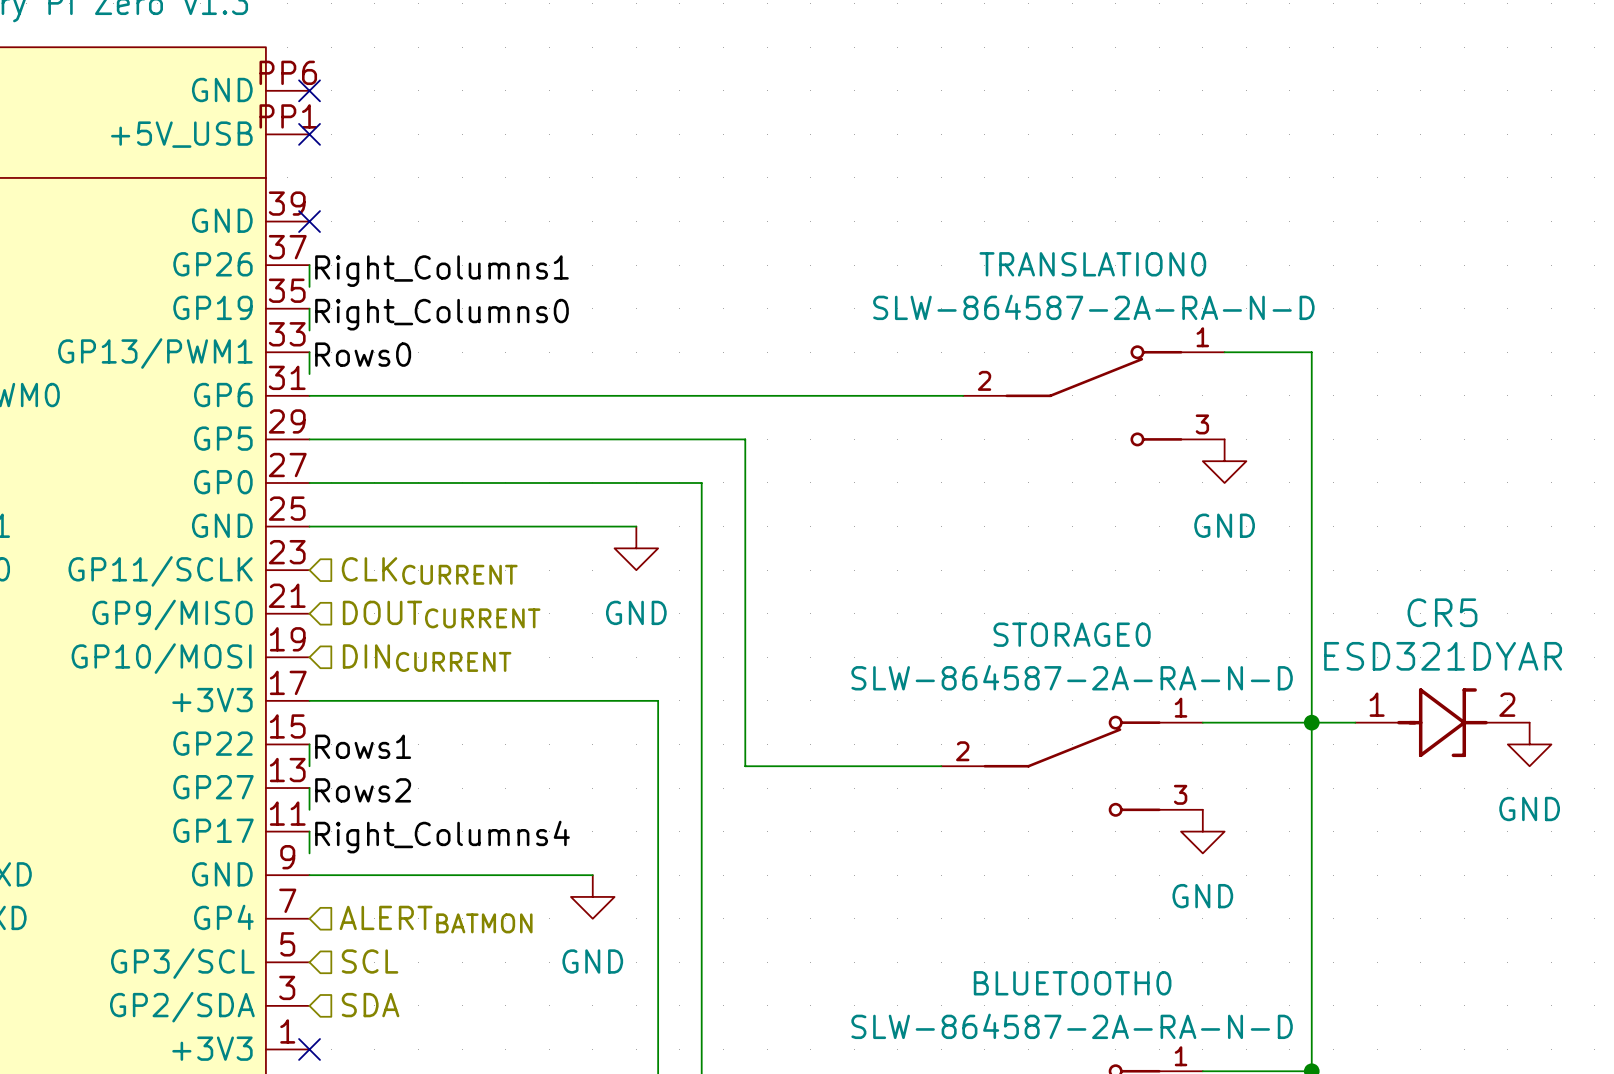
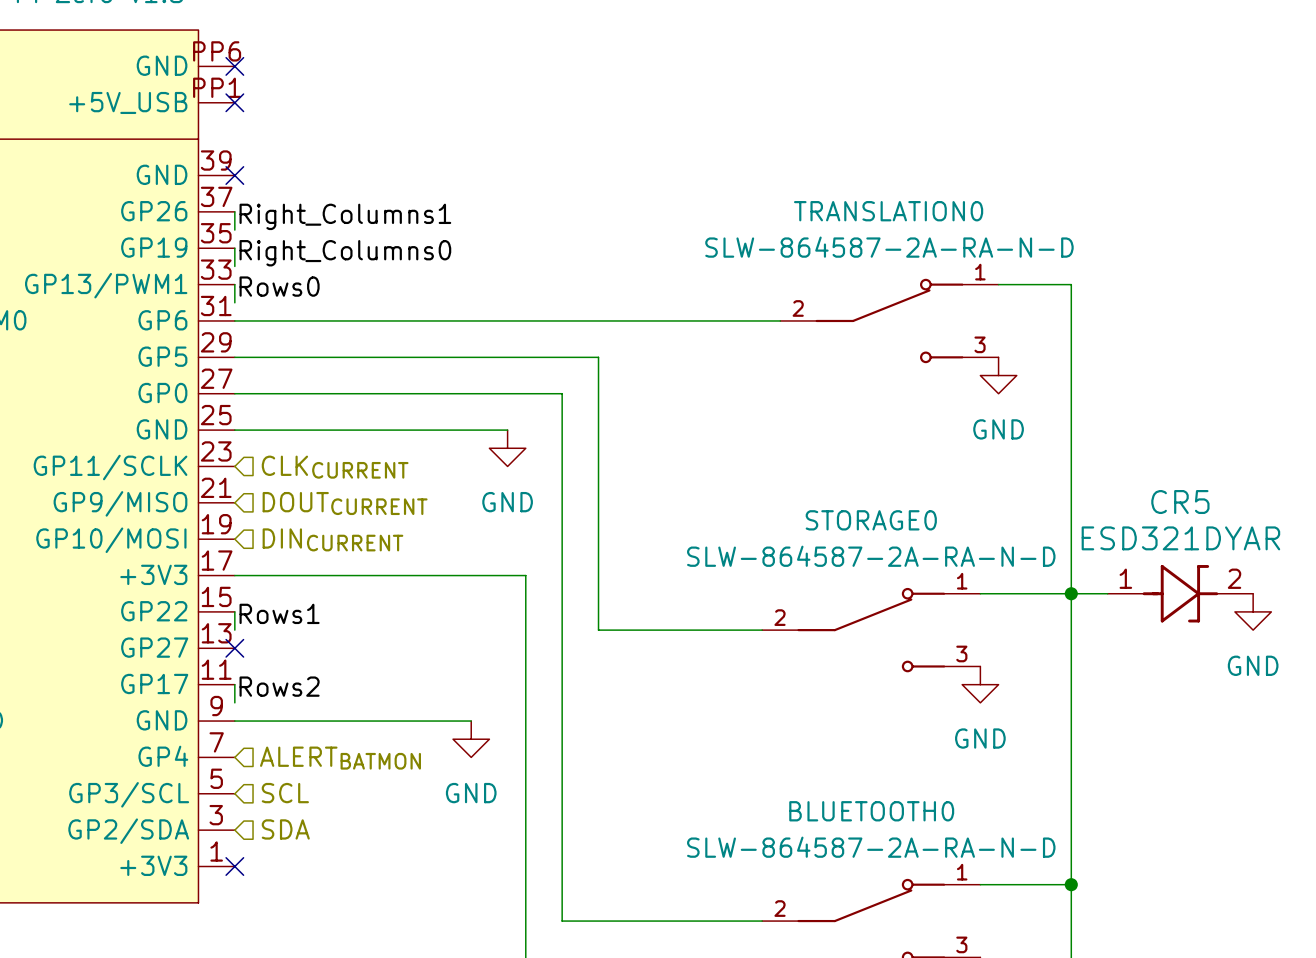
wire: (309, 788) (309, 809) -> none
no-connect mark: none -> (234, 648)
label: Rows2 (363, 790) -> none
label: Right_Columns4 (442, 837) -> Rows2 (279, 686)

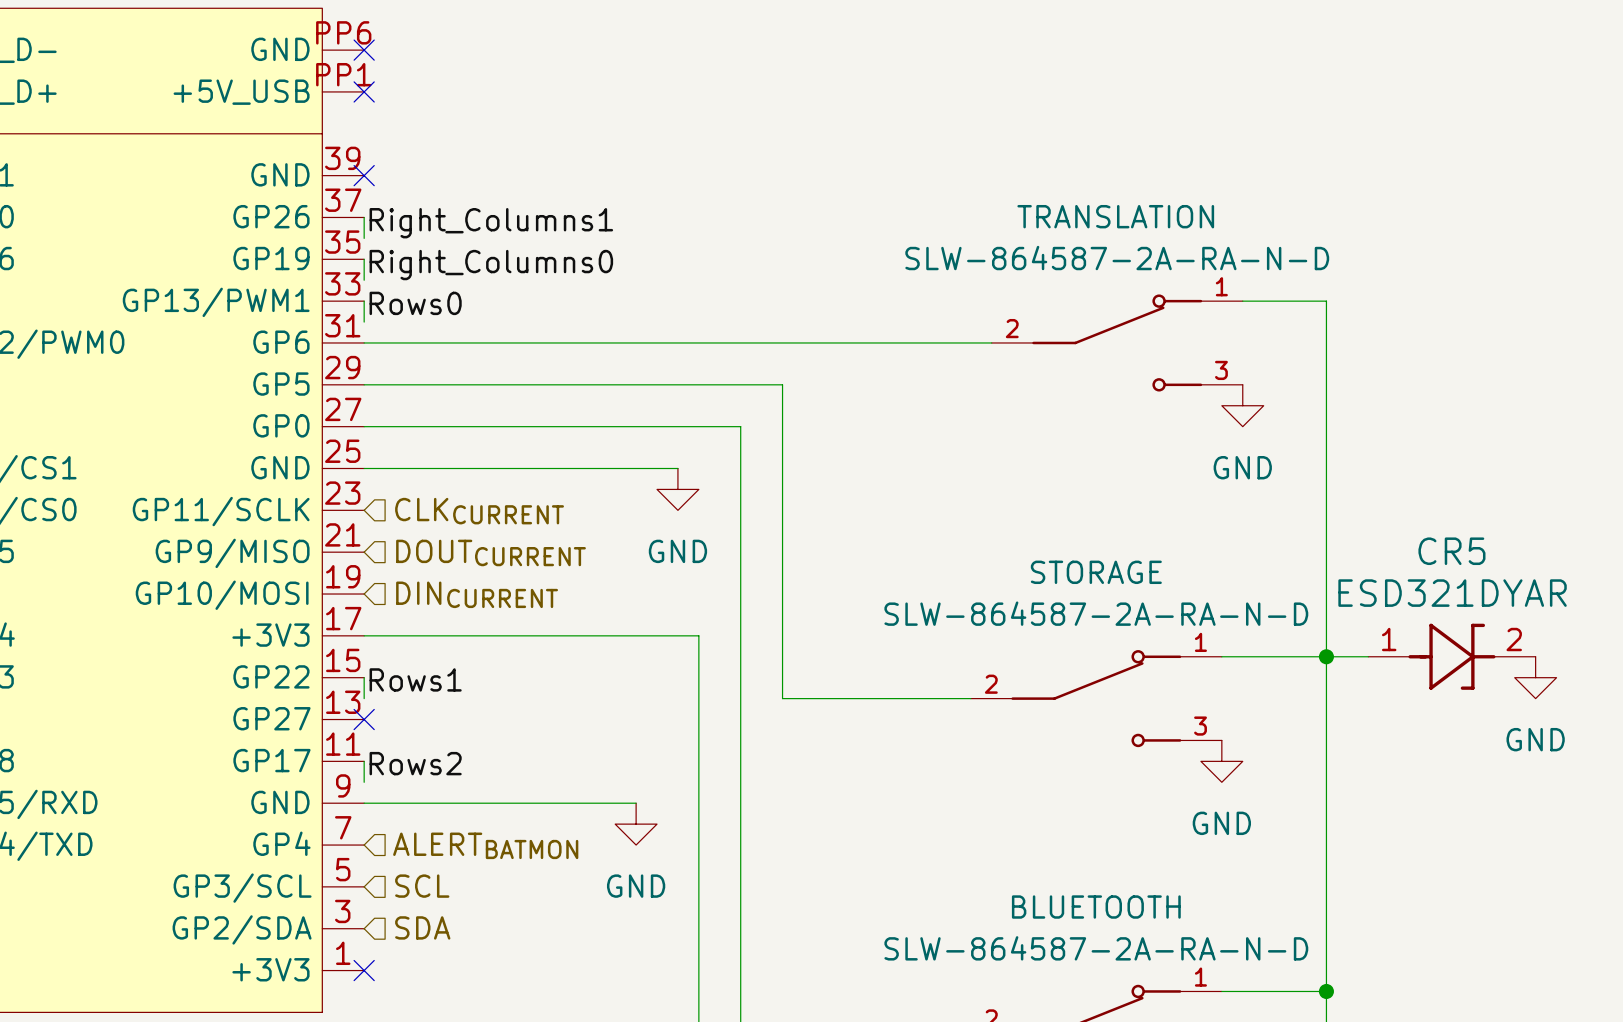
TRANSLATION0 name: TRANSLATION0 (888, 211) -> TRANSLATION (1115, 216)
STORAGE0 name: STORAGE0 (871, 520) -> STORAGE (1096, 572)
BLUETOOTH0 name: BLUETOOTH0 (871, 811) -> BLUETOOTH (1096, 907)

